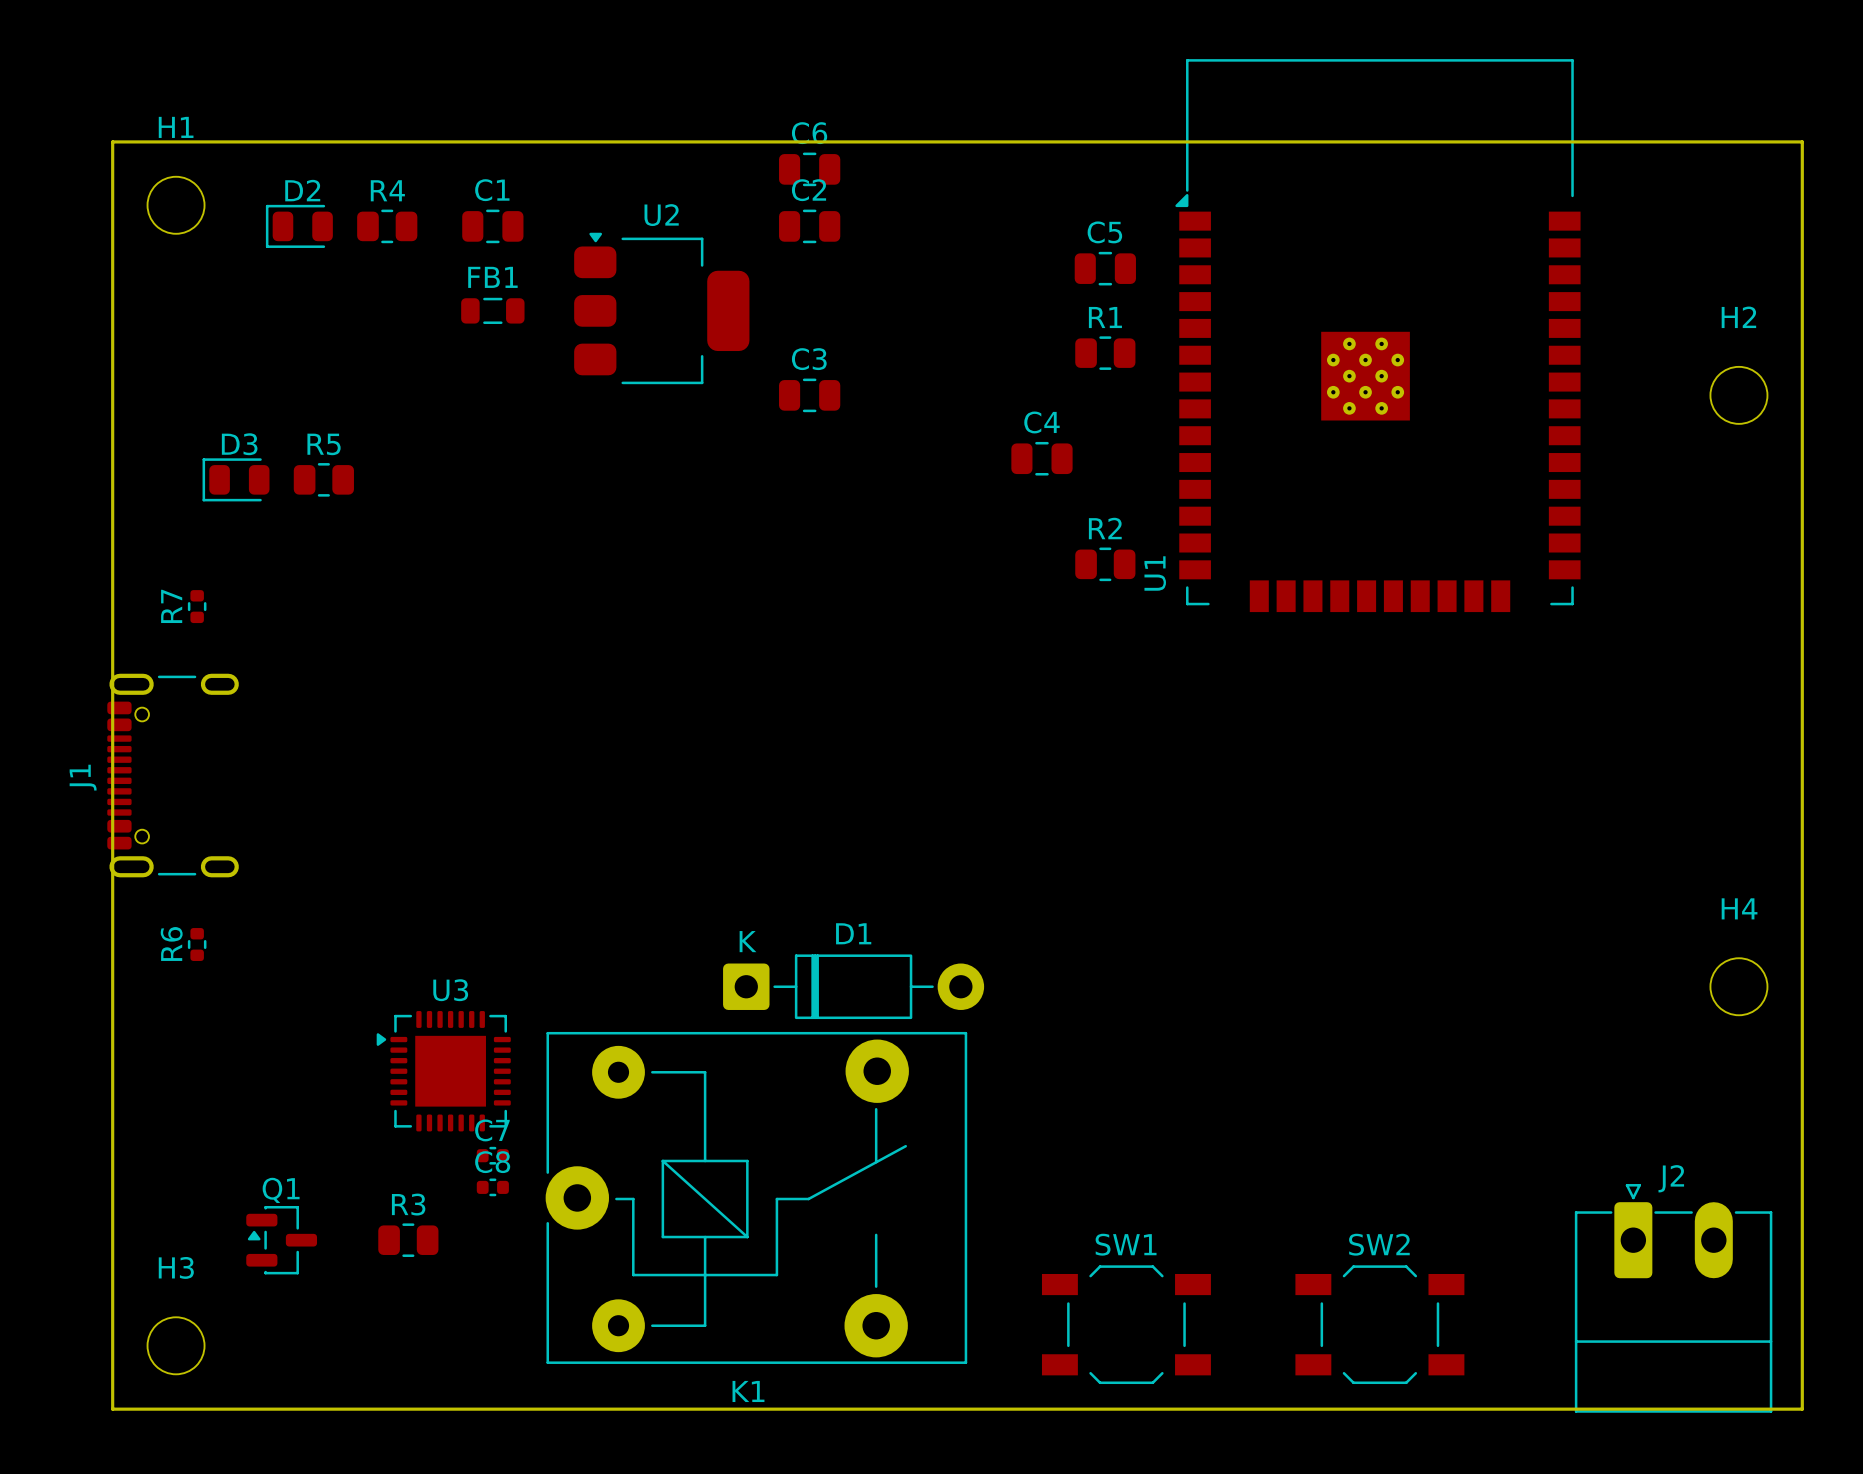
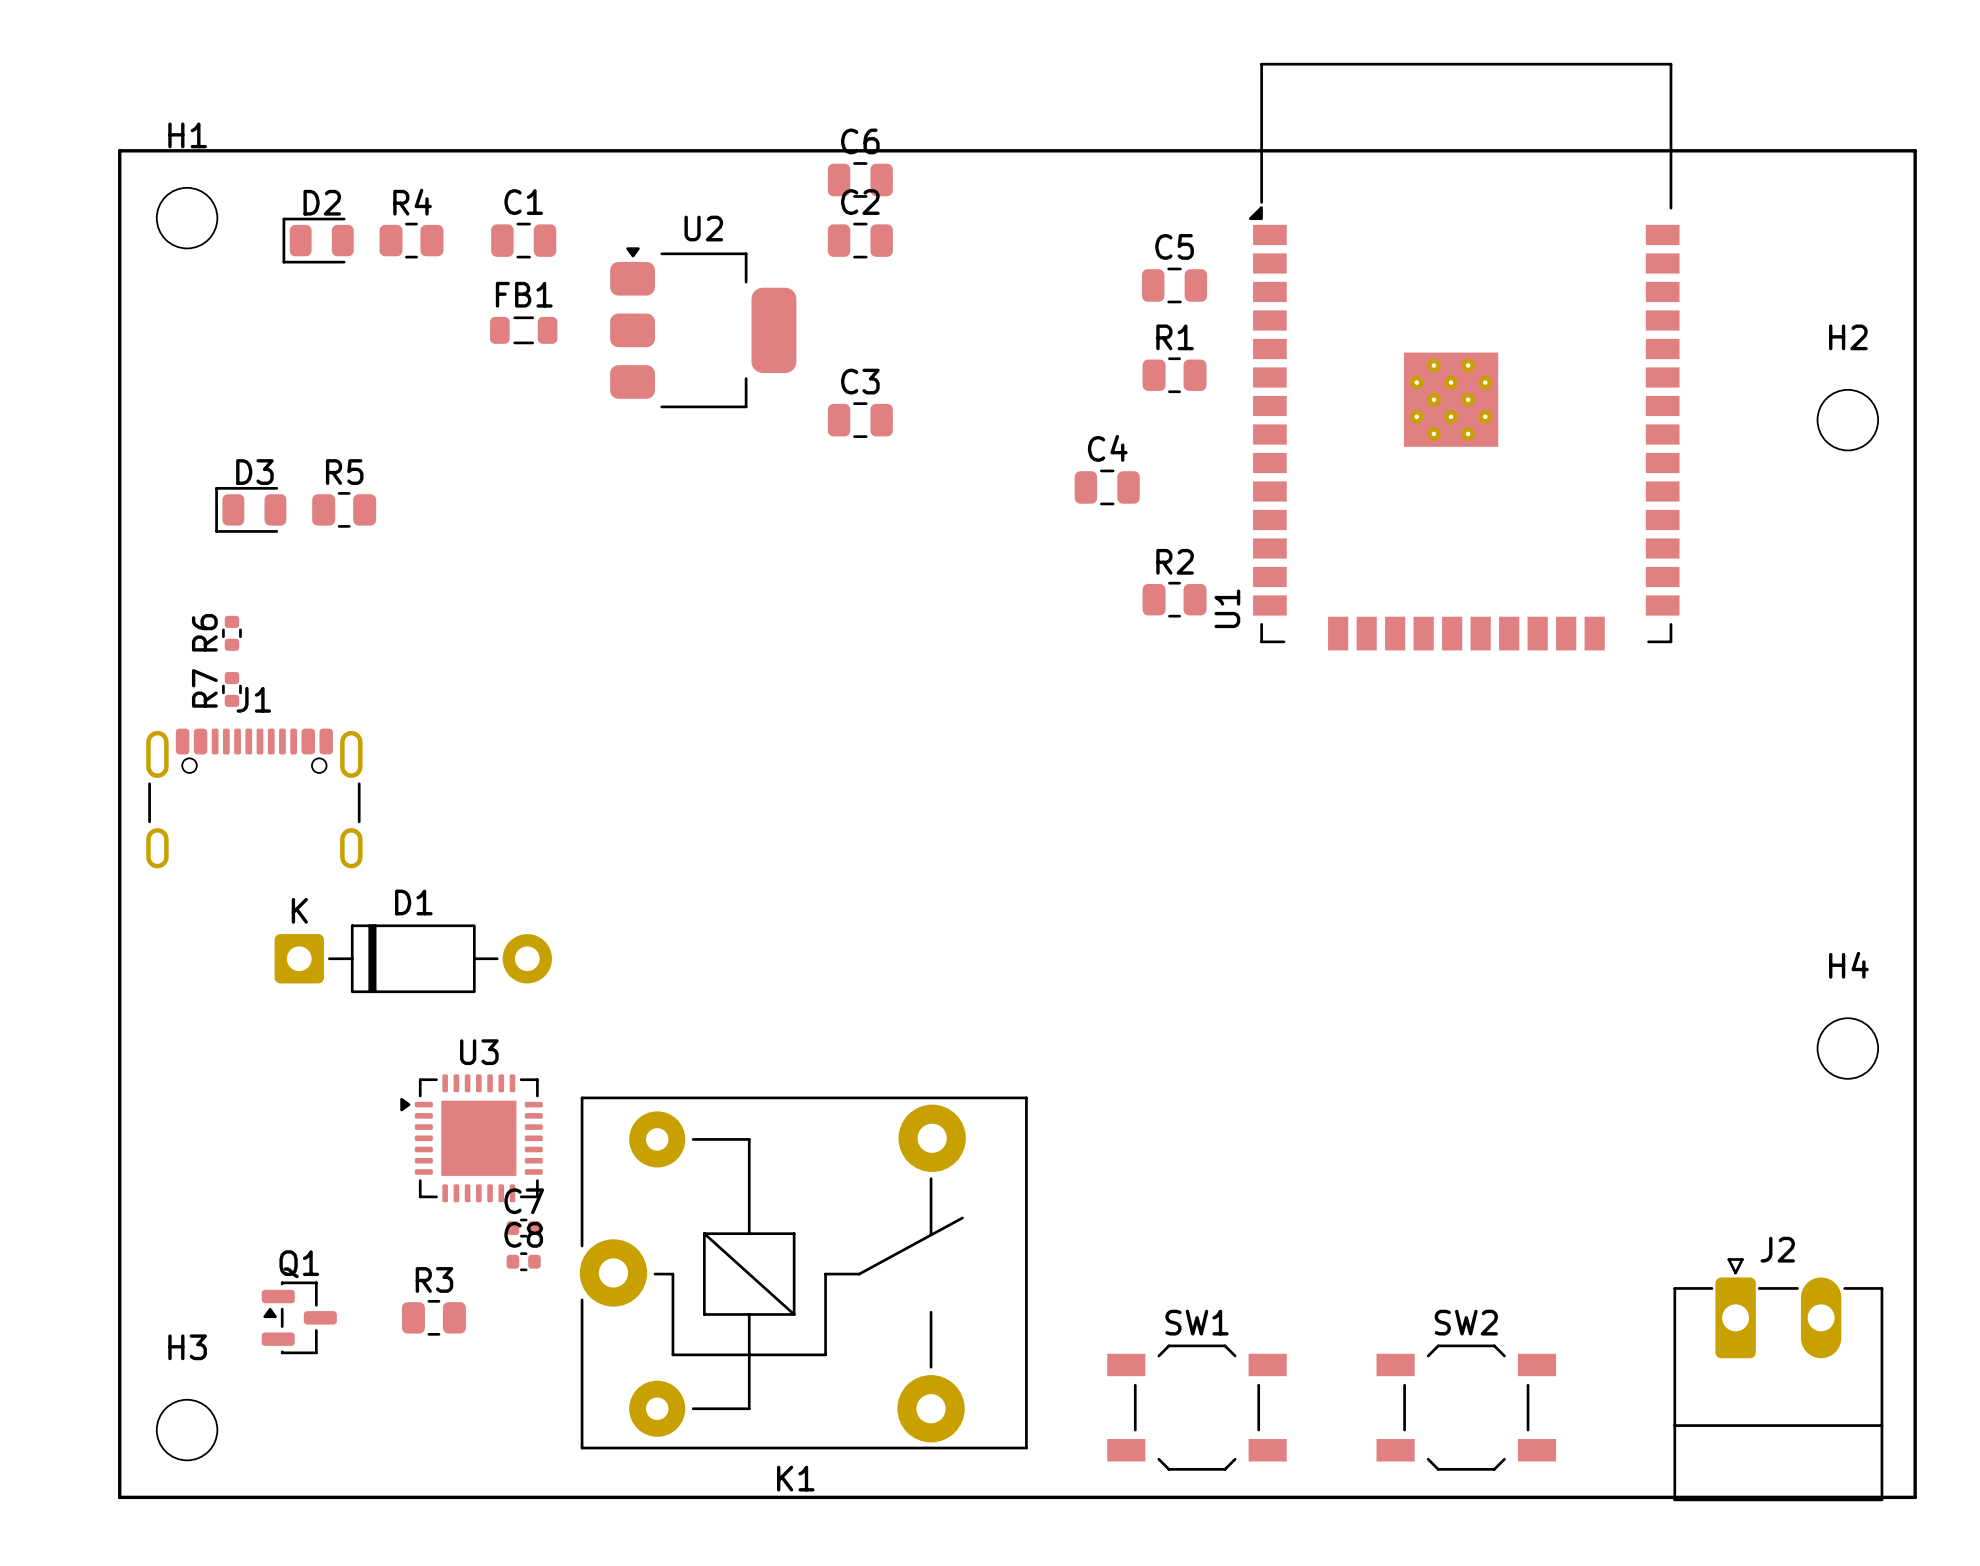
R7 position: (197, 606) -> (231, 689)
J1 rotation: 0° (173, 775) -> 90° clockwise (254, 798)
R6 position: (197, 944) -> (231, 633)
D1 position: (853, 986) -> (413, 958)

